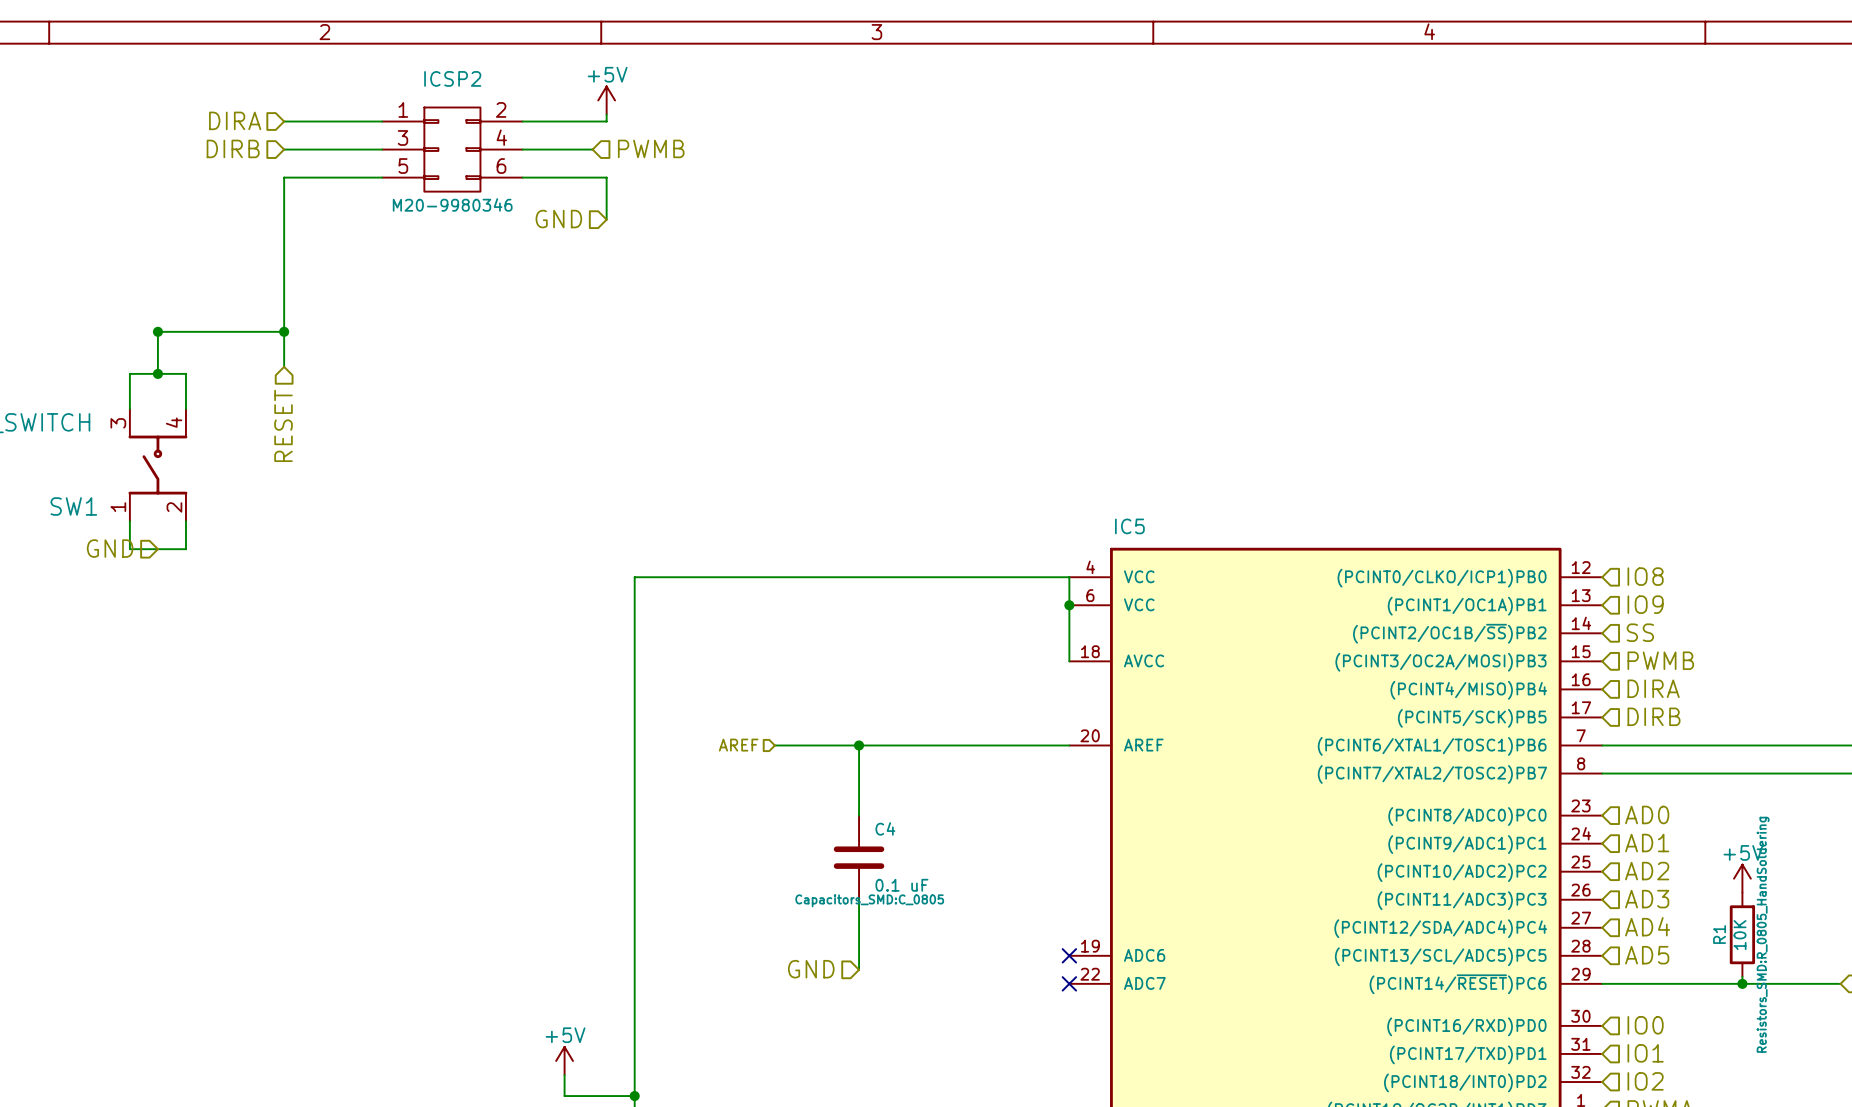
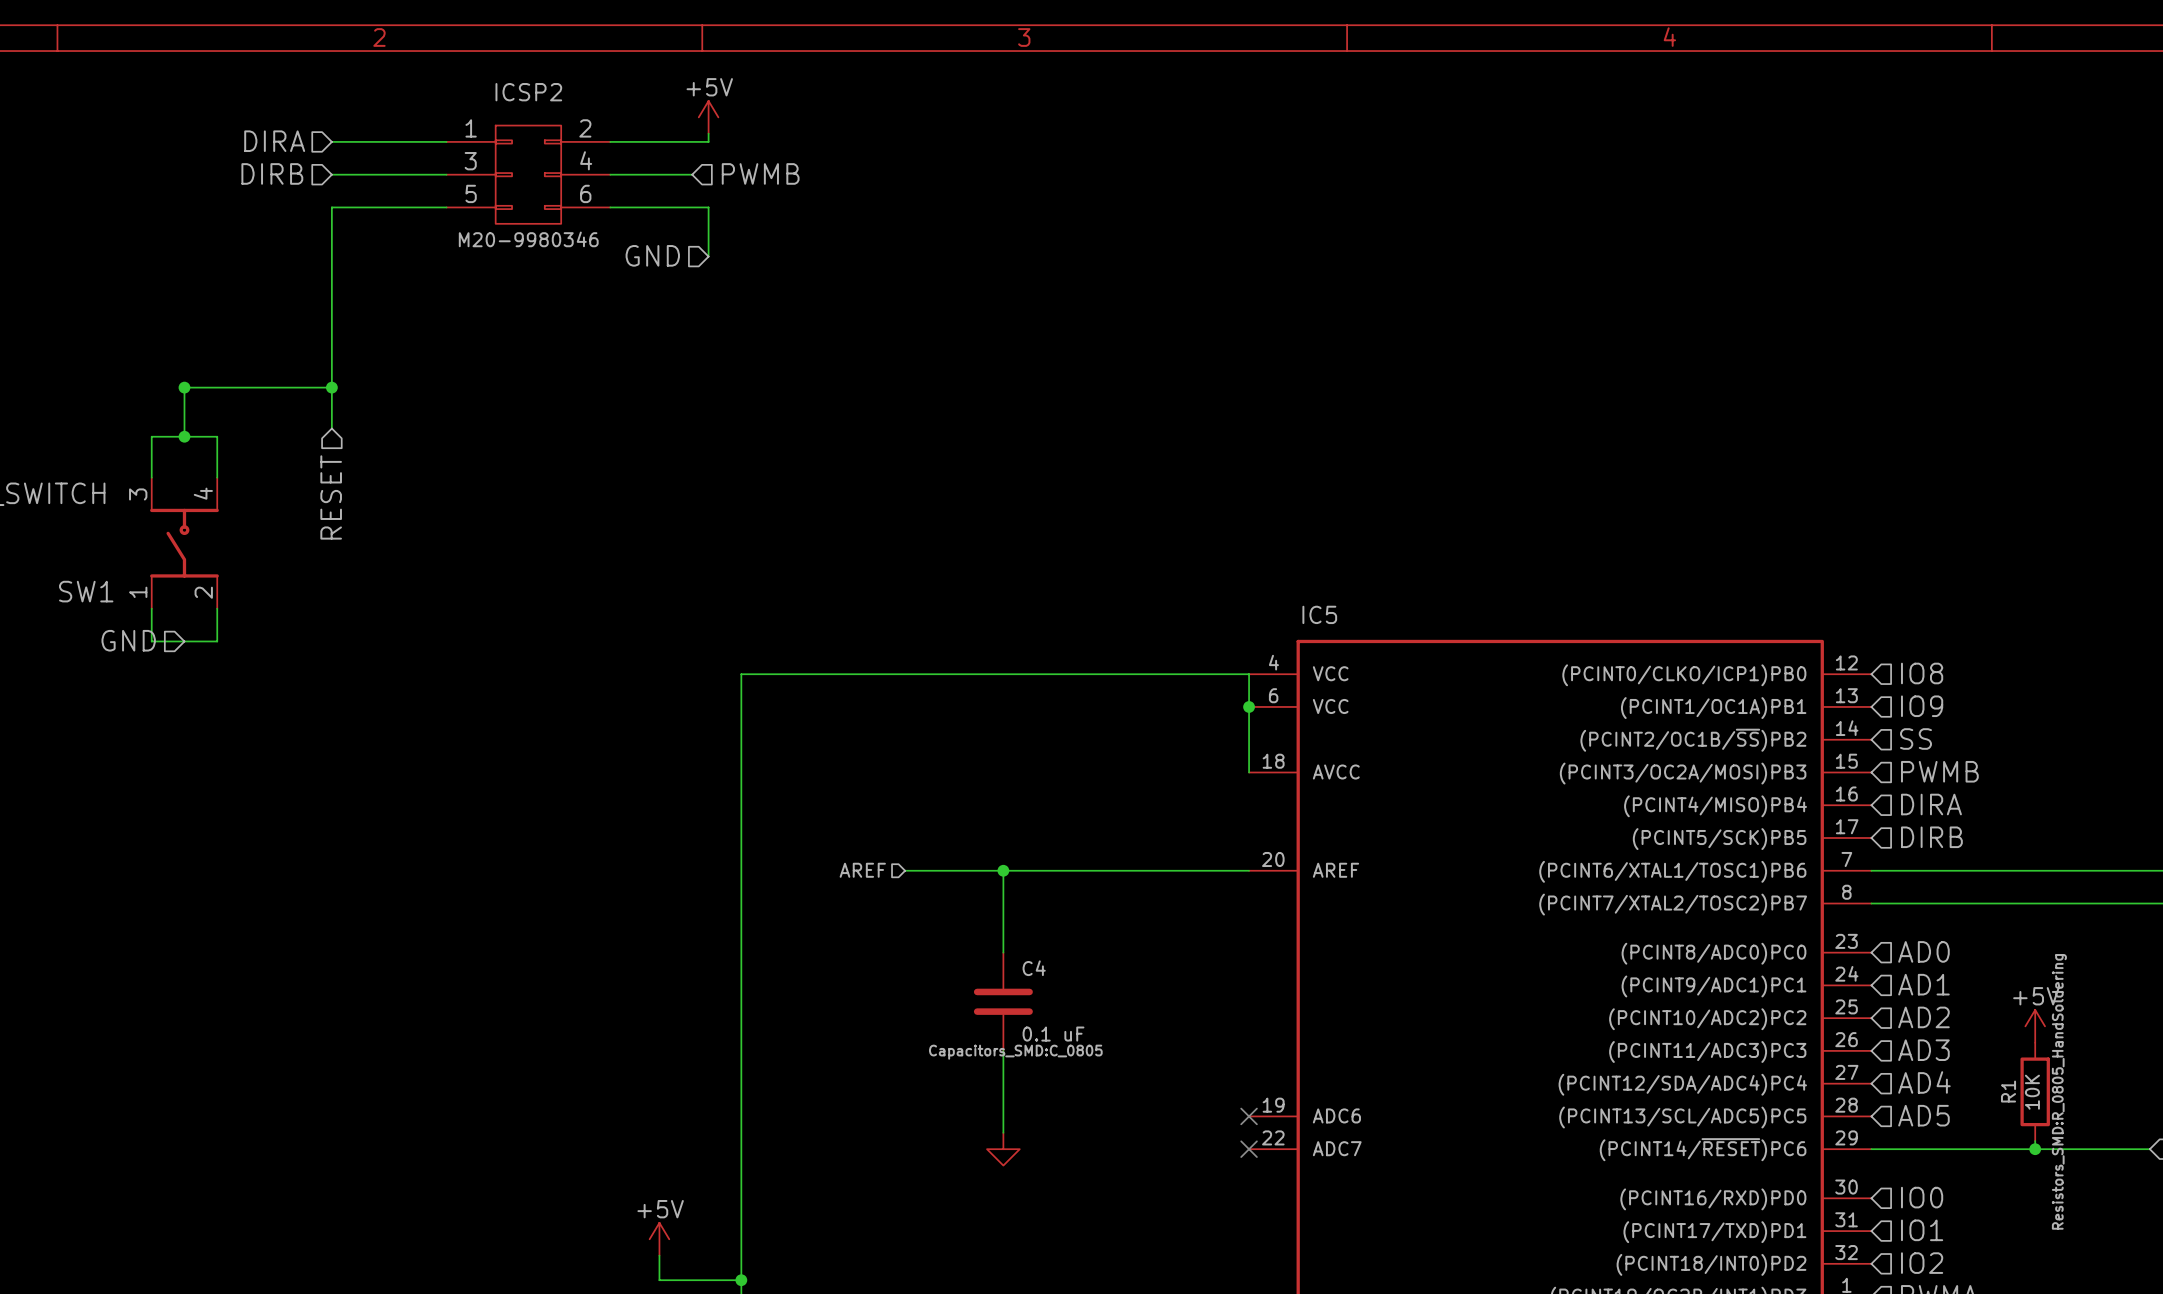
hierarchical label: GND (811, 969) -> none
power symbol: none -> (1003, 1149)

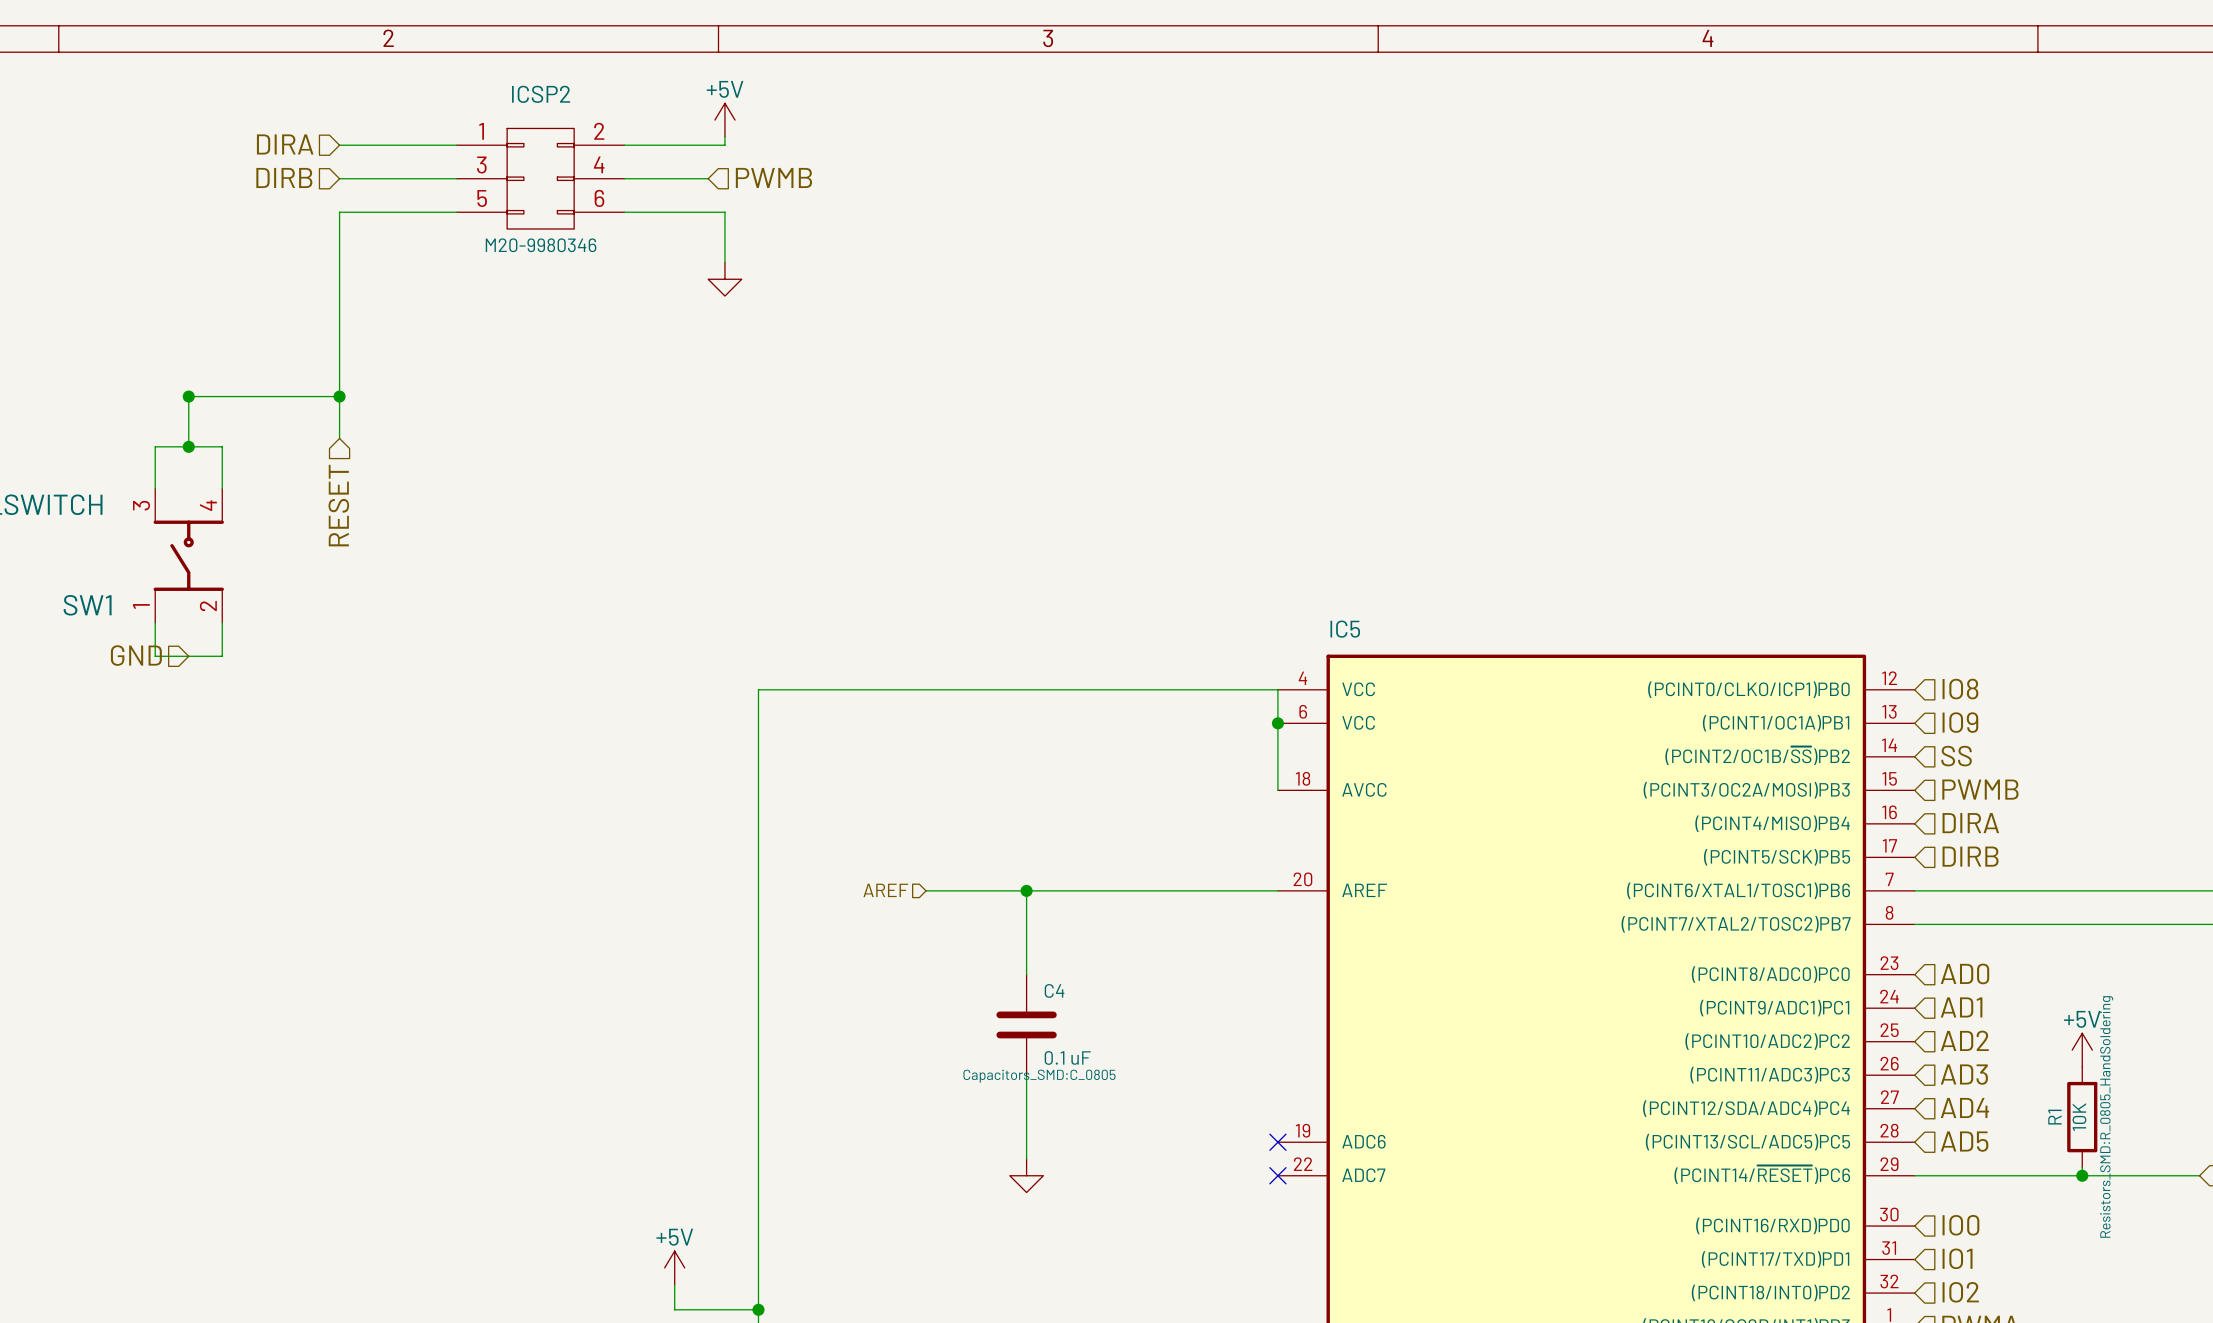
hierarchical label: GND (652, 255) -> none
power symbol: none -> (724, 279)

